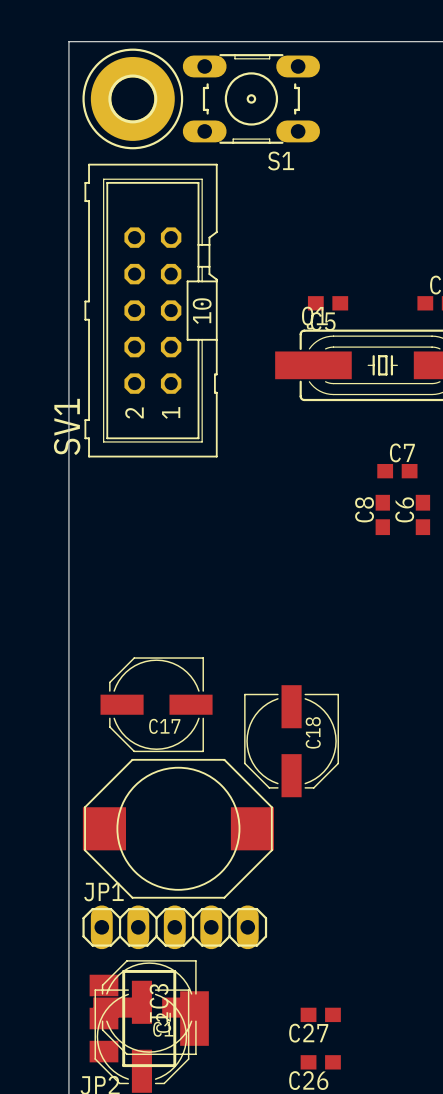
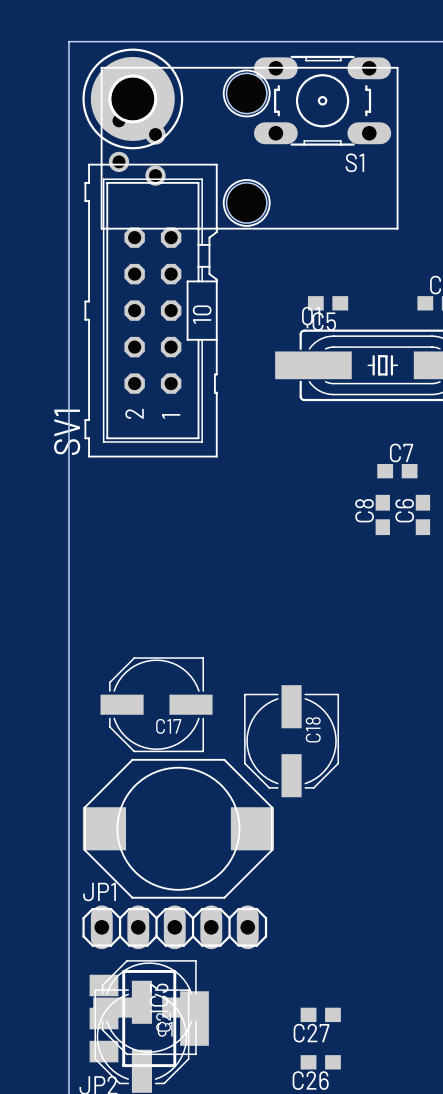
S1 position: (251, 98) -> (322, 100)
part: none -> (249, 148)

